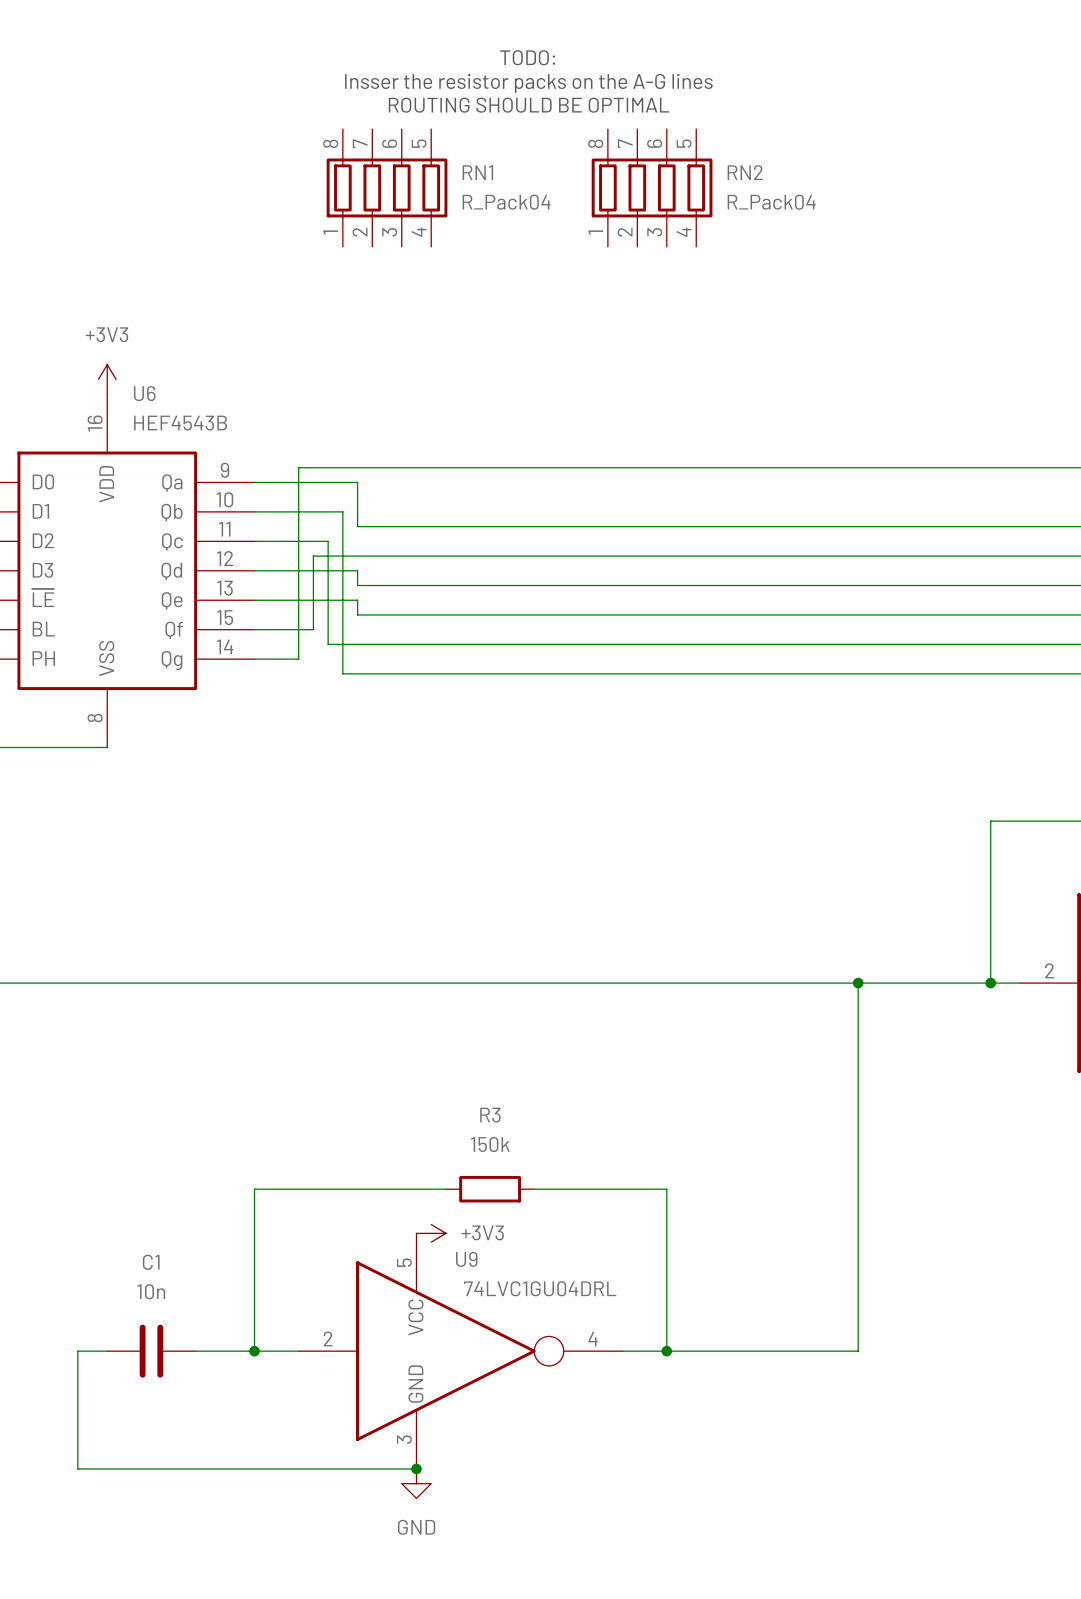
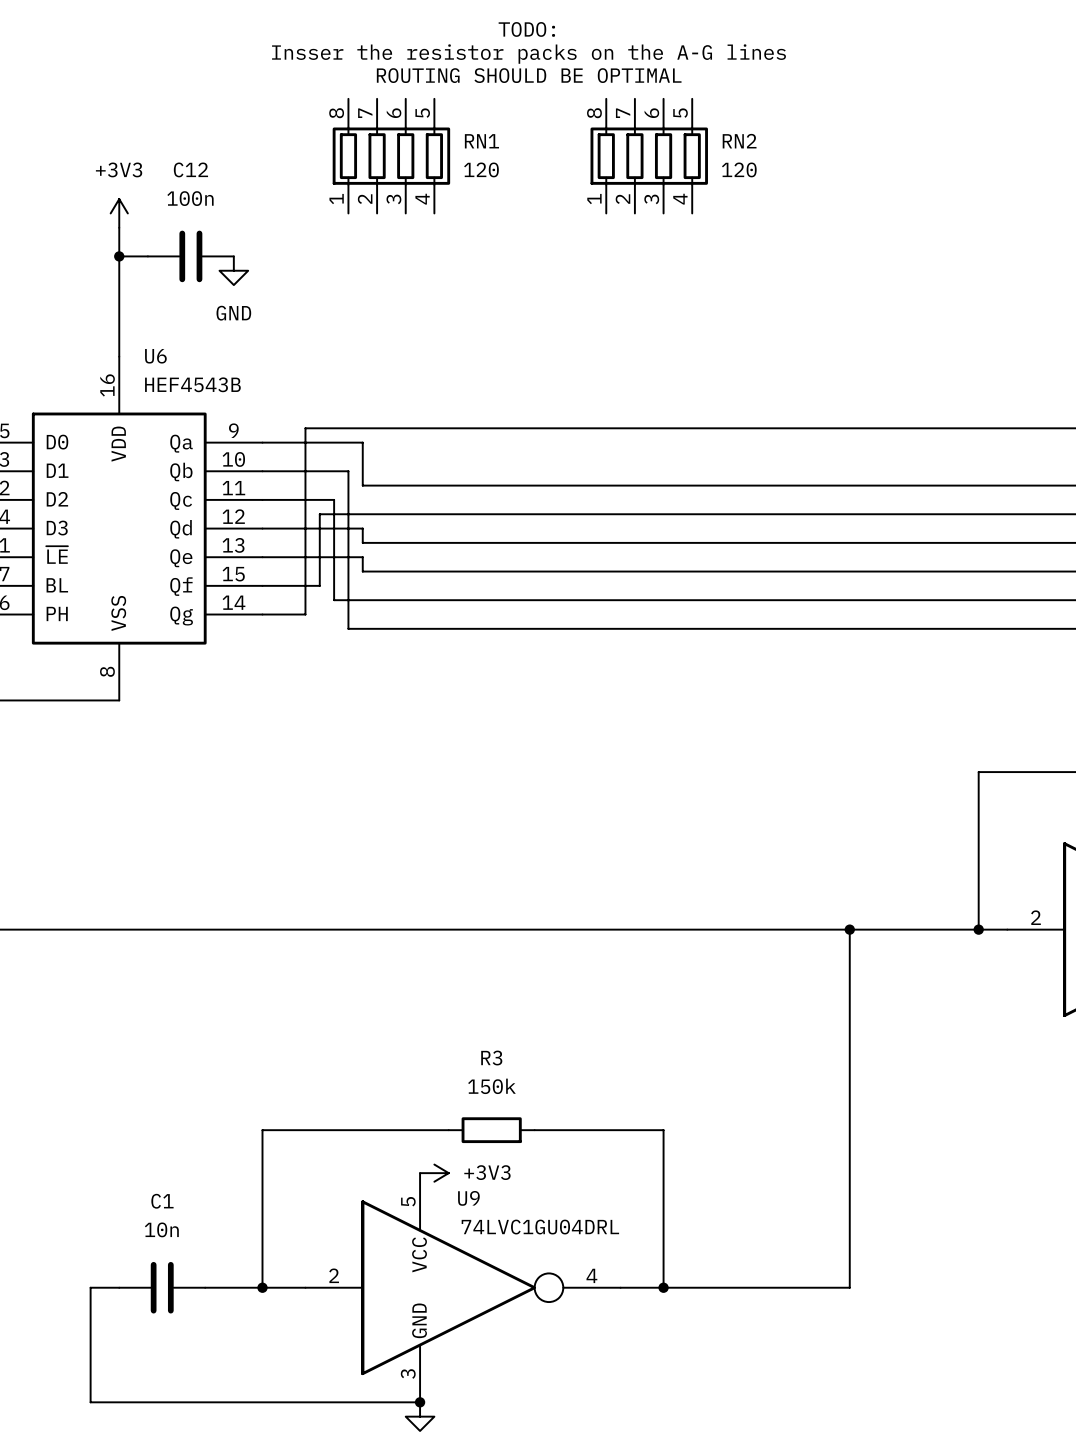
RN1 value: R_Pack04 (506, 202) -> 120 (481, 169)
RN2 value: R_Pack04 (771, 202) -> 120 (739, 169)
wire: none -> (119, 227) (119, 356)
wire: none -> (119, 256) (147, 256)
junction: none -> (119, 256)
C12: none -> 100n (190, 256)
power symbol: none -> GND (233, 270)
power symbol position: +3V3 (107, 379) -> +3V3 (119, 213)

